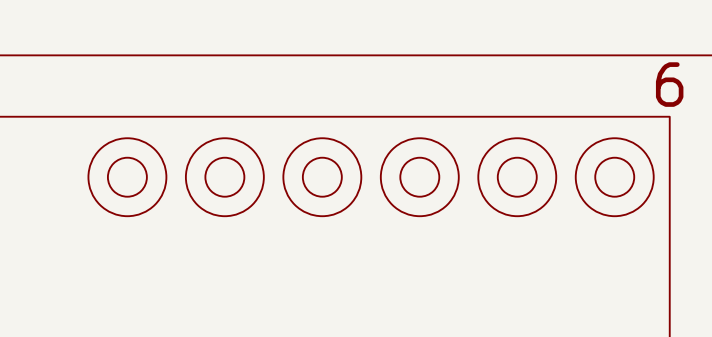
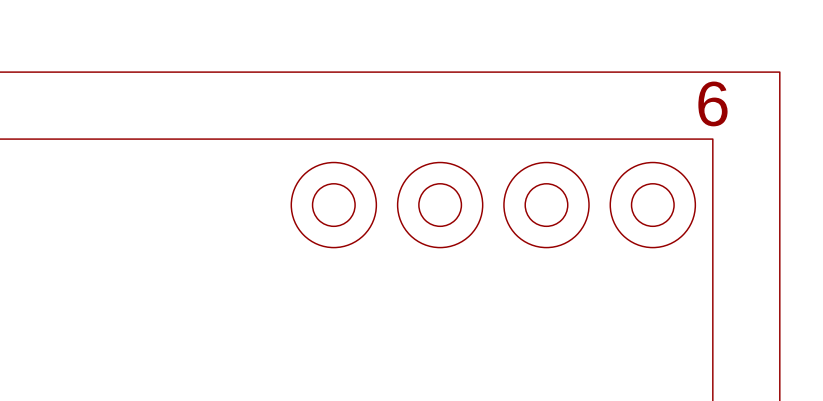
part: (127, 177) -> none
part: (224, 177) -> none

